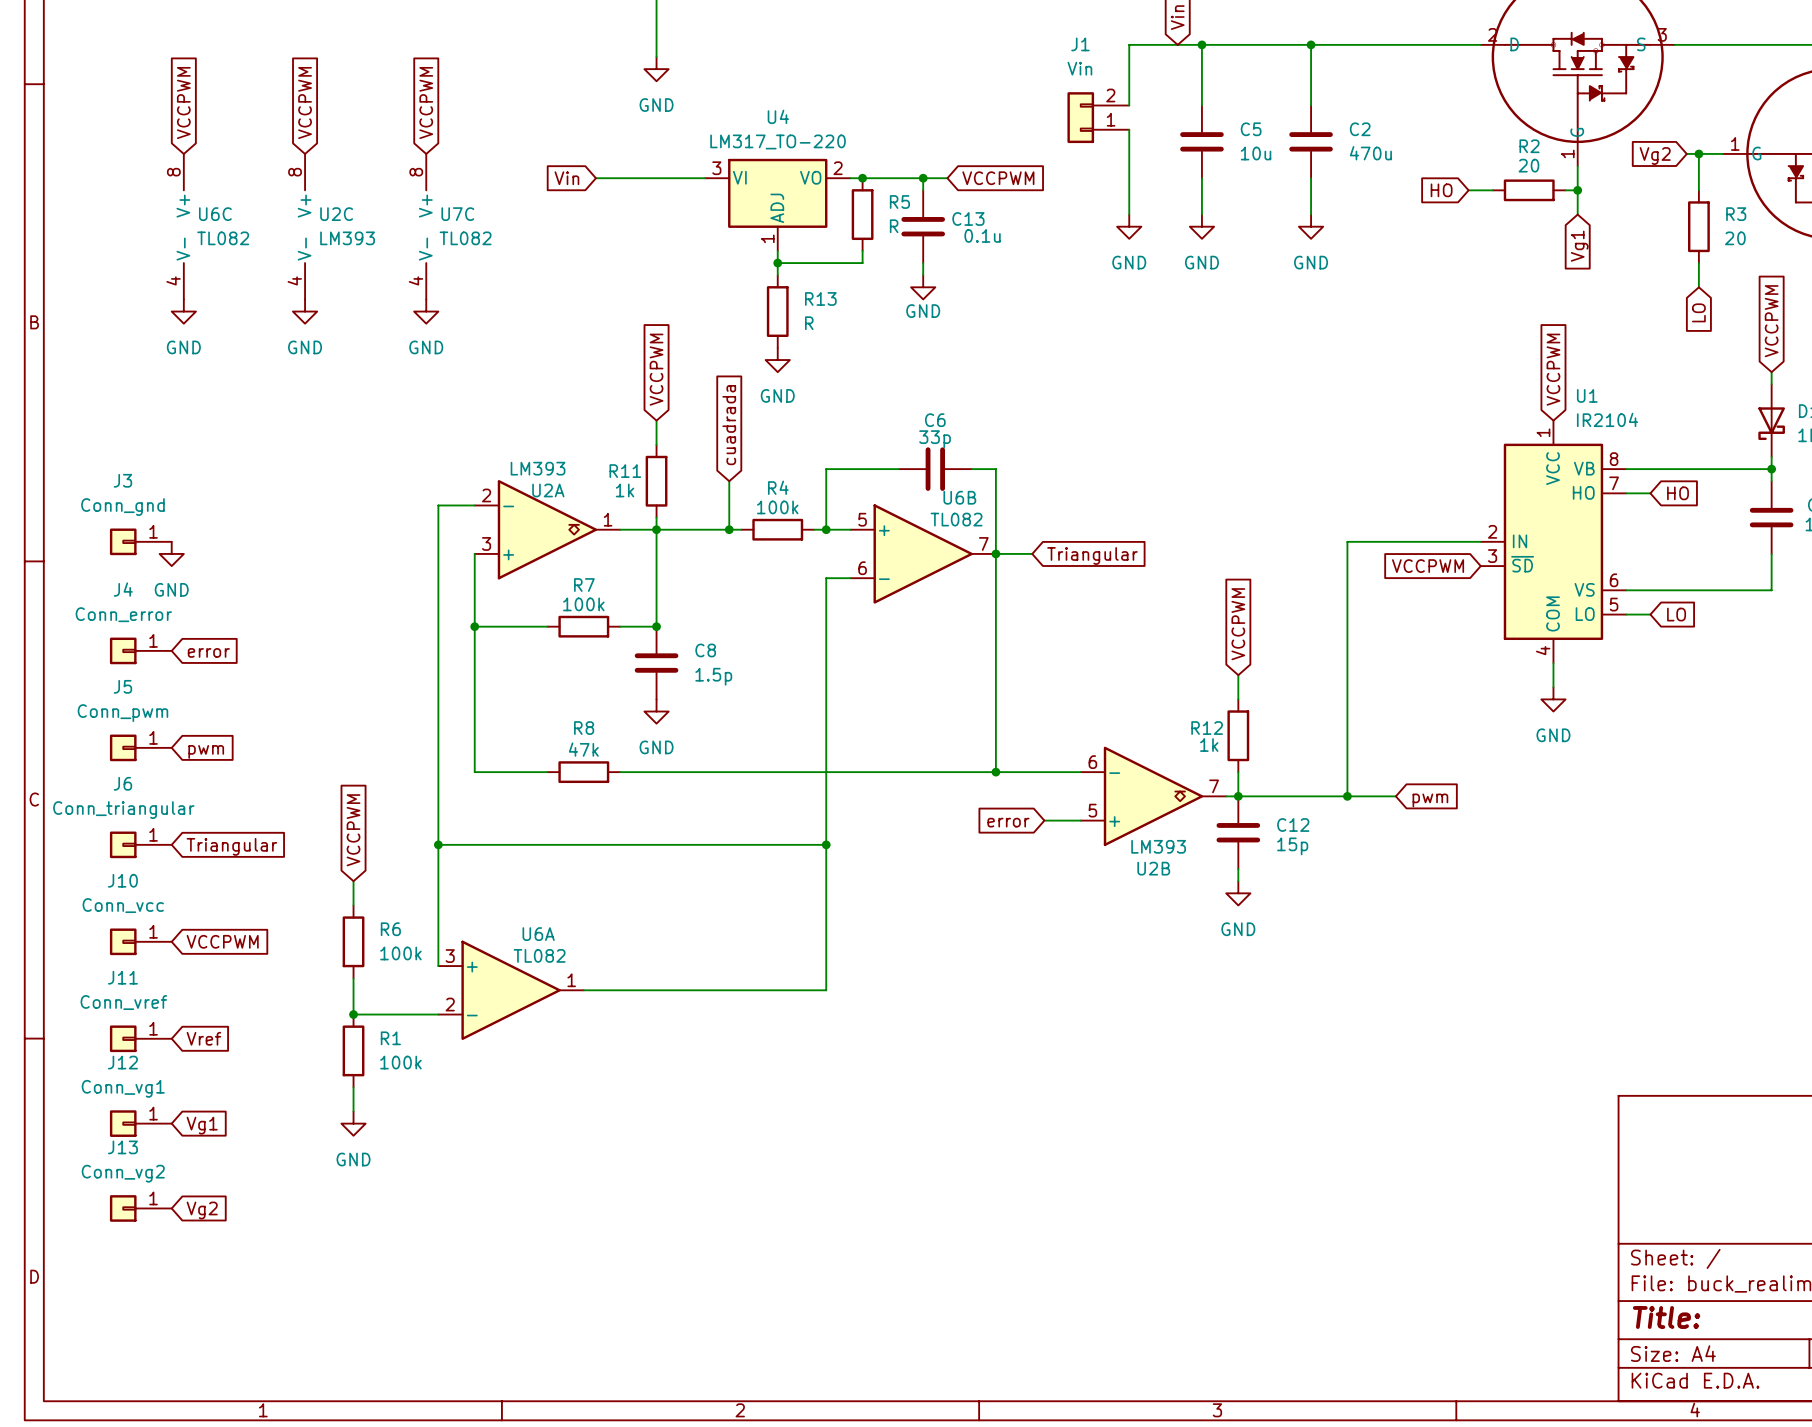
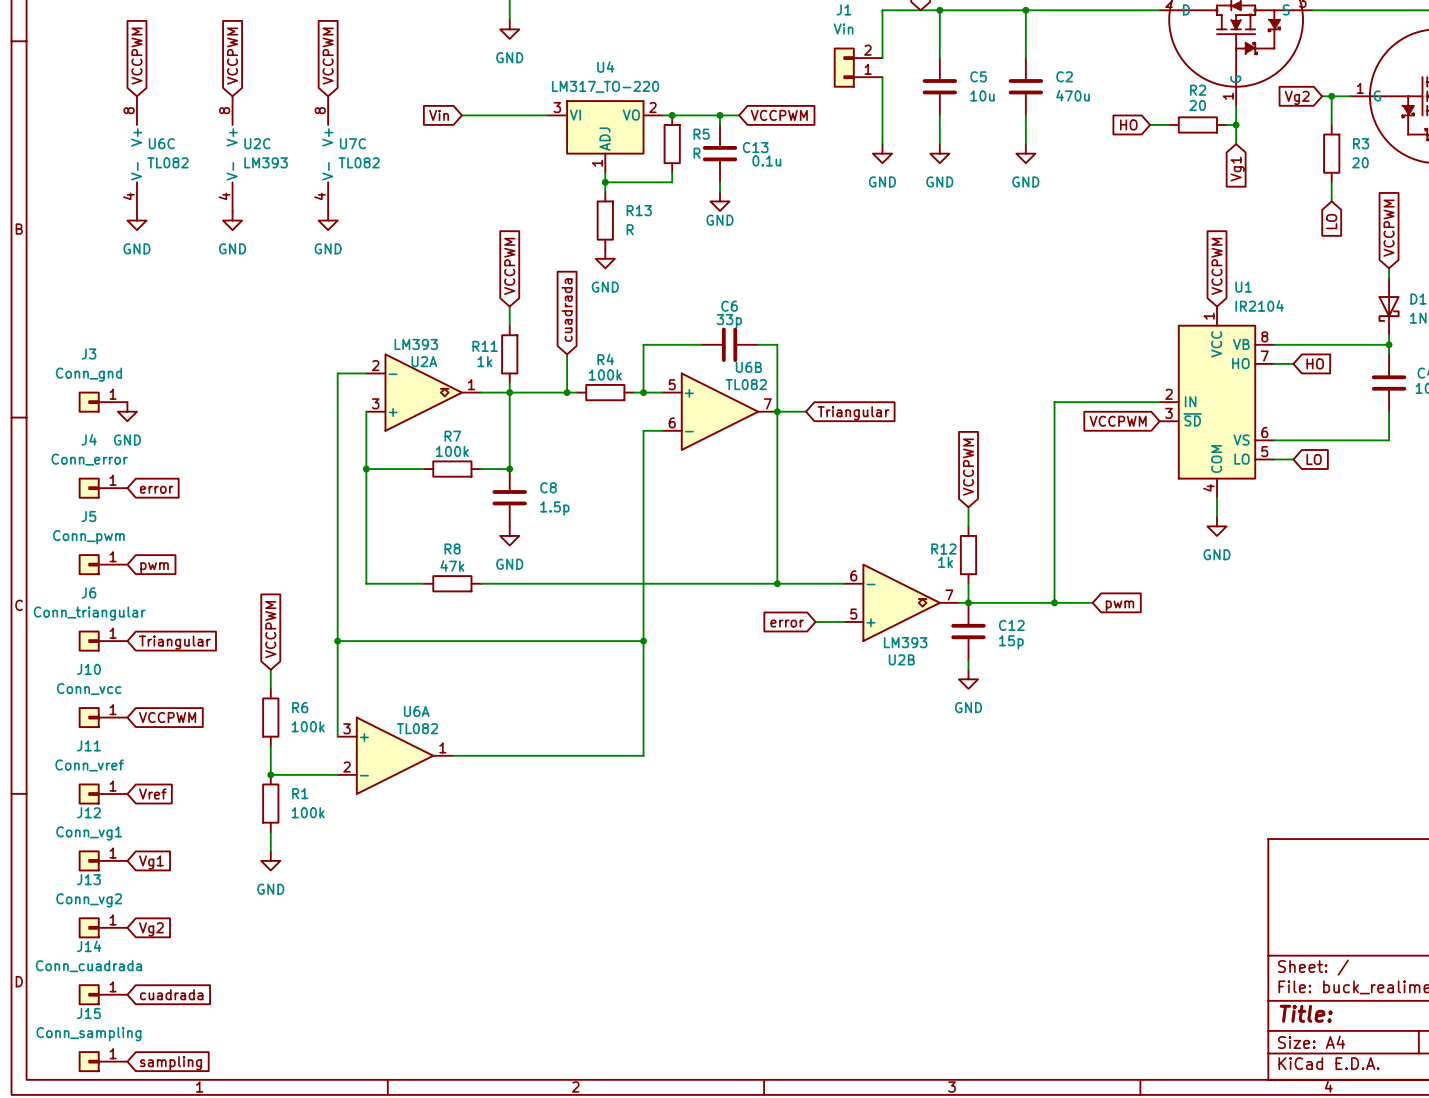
J14: none -> Conn_cuadrada (103, 994)
global label: none -> cuadrada (171, 994)
J15: none -> Conn_sampling (103, 1061)
global label: none -> sampling (171, 1063)

